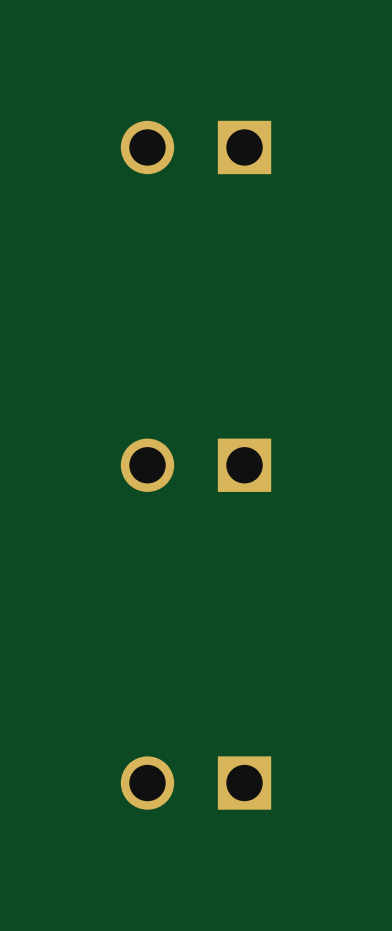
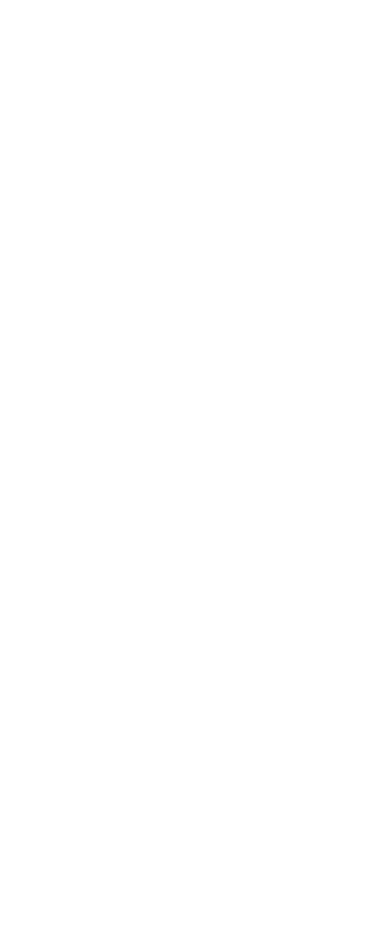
part: (196, 147) -> none
part: (196, 465) -> none
part: (196, 783) -> none

